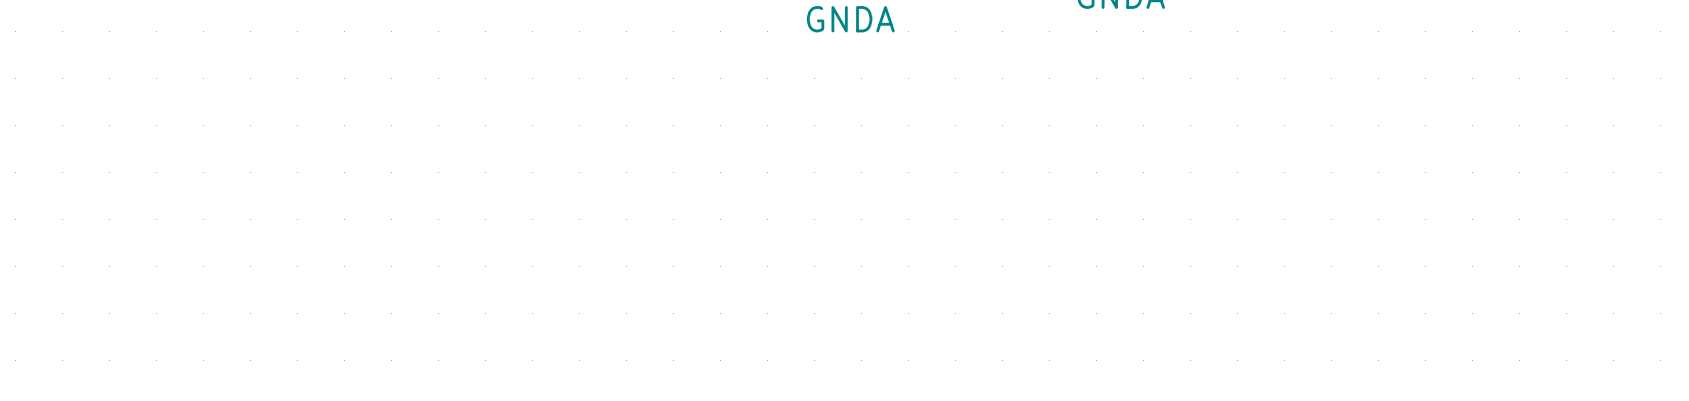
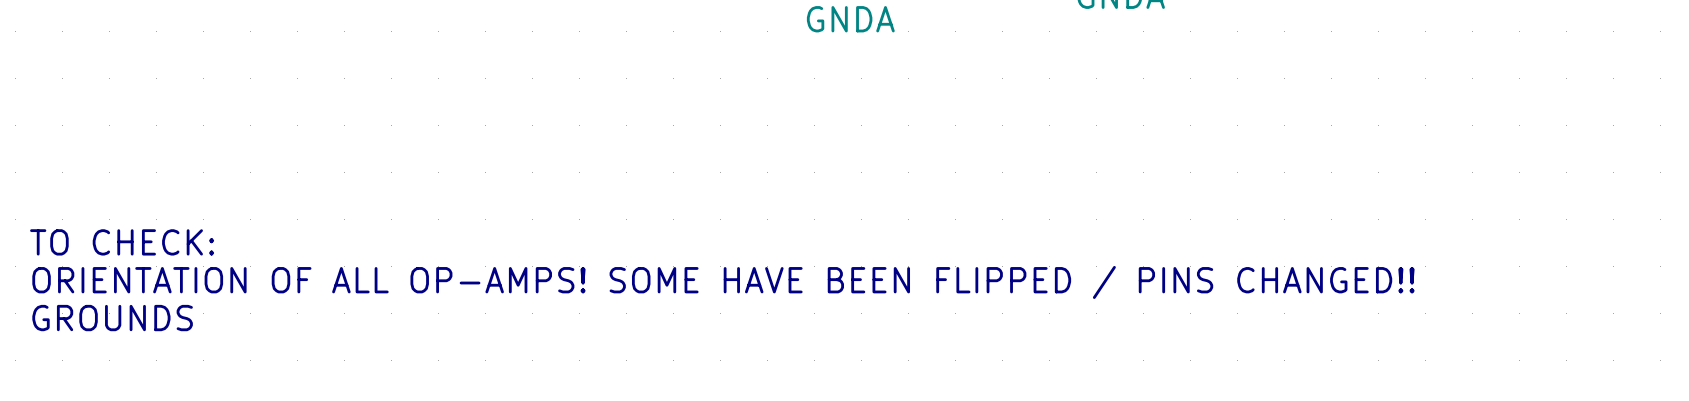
text: none -> TO CHECK: (122, 242)
text: none -> ORIENTATION OF ALL OP-AMPS! SOME HAVE BEEN FLIPPED / PINS CHANGED!! (723, 282)
text: none -> GROUNDS (112, 318)

